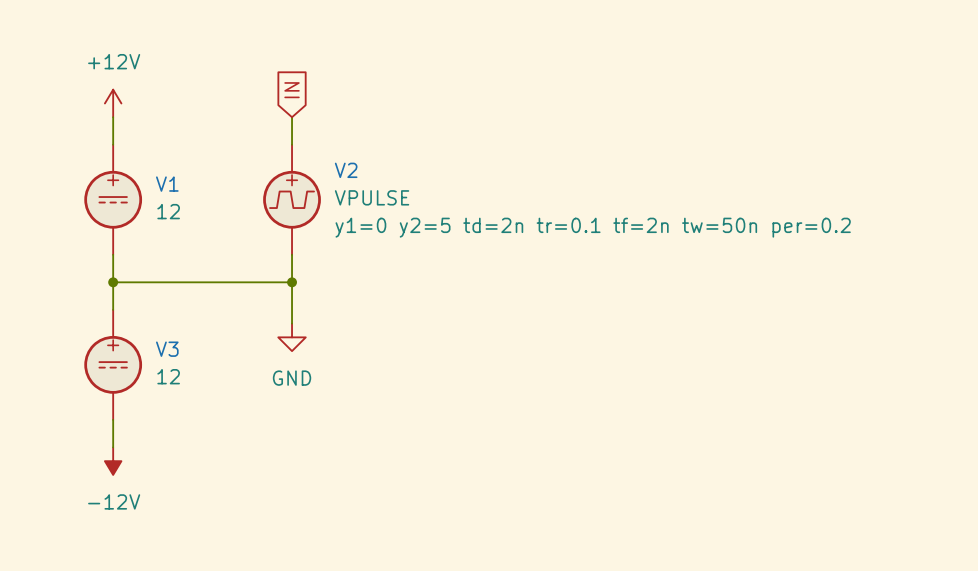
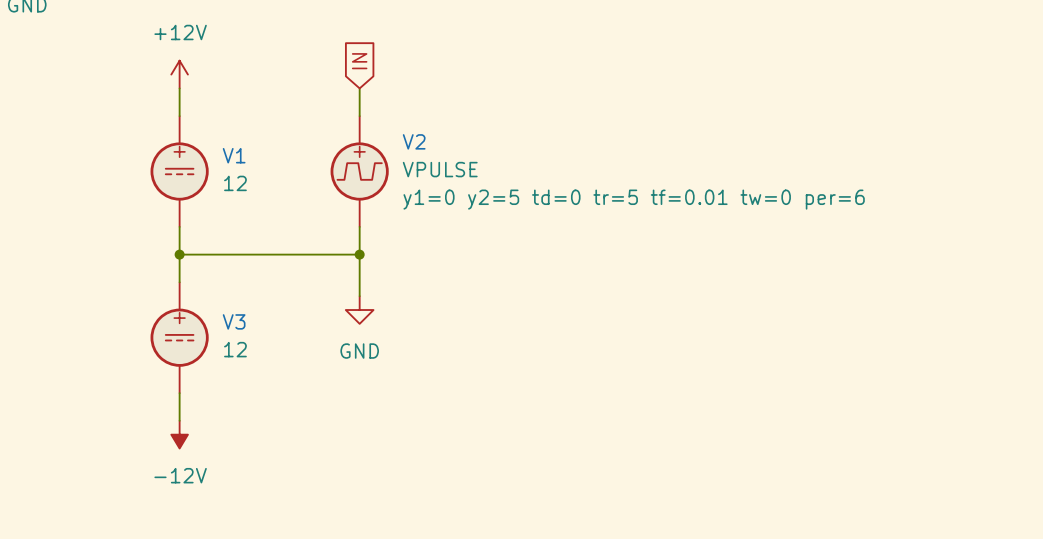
V2 text: y1=0 y2=5 td=2n tr=0.1 tf=2n tw=50n per=0.2 (593, 227) -> y1=0 y2=5 td=0 tr=5 tf=0.01 tw=0 per=6 (634, 199)

